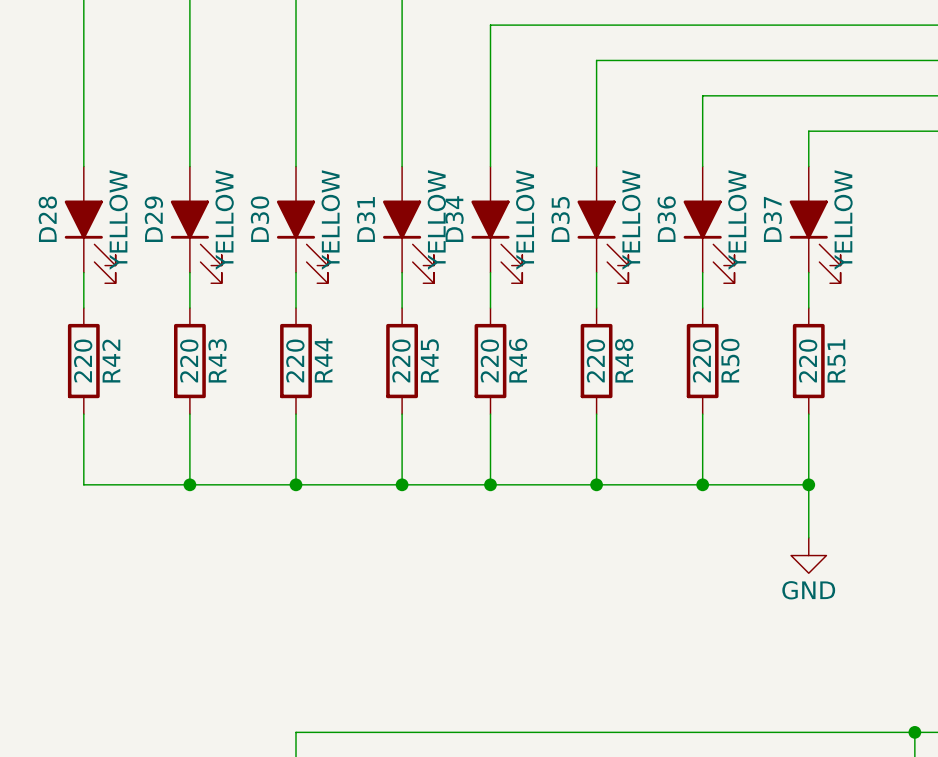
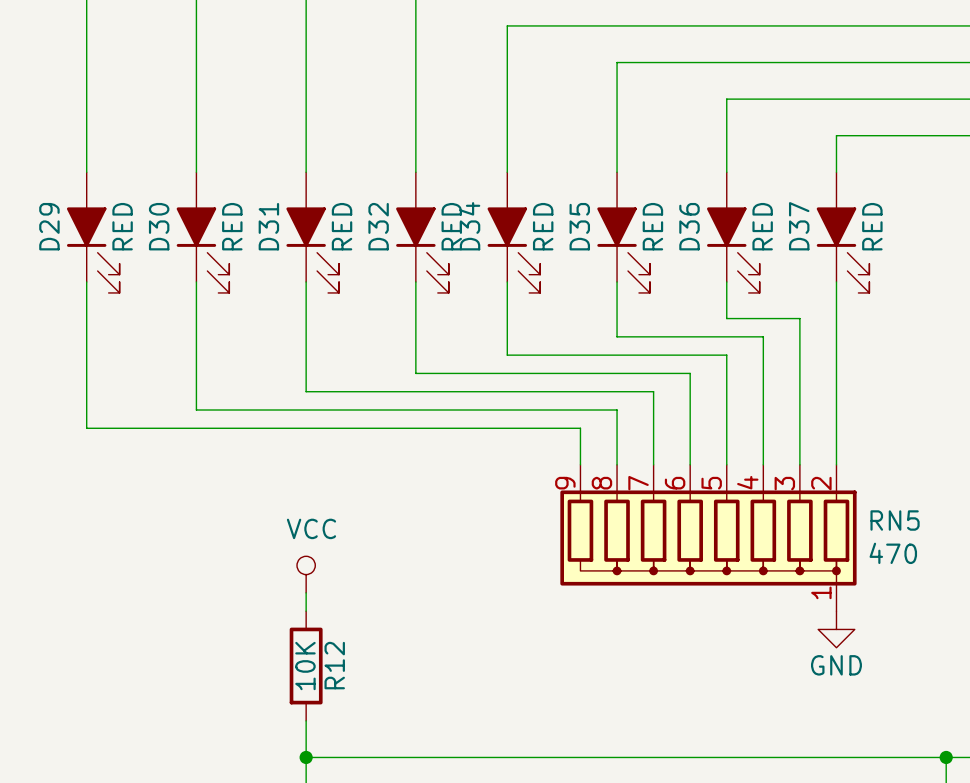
D28 name: D28 (47, 219) -> D29 (49, 226)
D29 name: D29 (153, 219) -> D30 (159, 226)
D30 name: D30 (259, 219) -> D31 (268, 226)
D31 name: D31 (366, 219) -> D32 (378, 226)
D28 value: YELLOW (118, 220) -> RED (122, 226)
D29 value: YELLOW (224, 220) -> RED (232, 226)
D30 value: YELLOW (330, 220) -> RED (342, 226)
D31 value: YELLOW (436, 220) -> RED (451, 226)
D34 value: YELLOW (525, 220) -> RED (543, 226)
D35 value: YELLOW (631, 220) -> RED (652, 226)
D36 value: YELLOW (737, 220) -> RED (762, 226)
D37 value: YELLOW (843, 220) -> RED (872, 226)
wire: none -> (86, 318) (86, 428) (580, 428) (580, 464)
wire: none -> (196, 318) (196, 410) (617, 410) (617, 428)
wire: none -> (306, 318) (306, 391) (653, 391) (653, 464)
wire: none -> (415, 318) (415, 373) (690, 373) (690, 464)
wire: none -> (507, 318) (507, 355) (726, 355) (726, 428)
wire: none -> (617, 318) (617, 336) (763, 336) (763, 464)
wire: none -> (726, 318) (799, 318) (799, 464)
wire: none -> (836, 318) (836, 428)
R42: 220 (83, 361) -> none
R43: 220 (189, 361) -> none
R44: 220 (296, 361) -> none
R45: 220 (402, 361) -> none
R46: 220 (490, 361) -> none
R48: 220 (596, 361) -> none
R50: 220 (702, 361) -> none
R51: 220 (808, 361) -> none
wire: (83, 414) (83, 484) (808, 484) -> none
wire: (189, 414) (189, 484) -> none
wire: (296, 414) (296, 484) -> none
wire: (402, 414) (402, 484) -> none
wire: (490, 414) (490, 484) -> none
junction: (189, 484) -> none
junction: (296, 484) -> none
junction: (402, 484) -> none
junction: (490, 484) -> none
junction: (596, 484) -> none
junction: (702, 484) -> none
junction: (808, 484) -> none
RN5: none -> 470 (708, 538)
power symbol: none -> VCC (306, 574)
power symbol position: GND (808, 555) -> GND (836, 629)
wire: none -> (306, 592) (306, 611)
R12: none -> 10K (306, 666)
wire: none -> (306, 720) (306, 757)
junction: none -> (306, 757)

